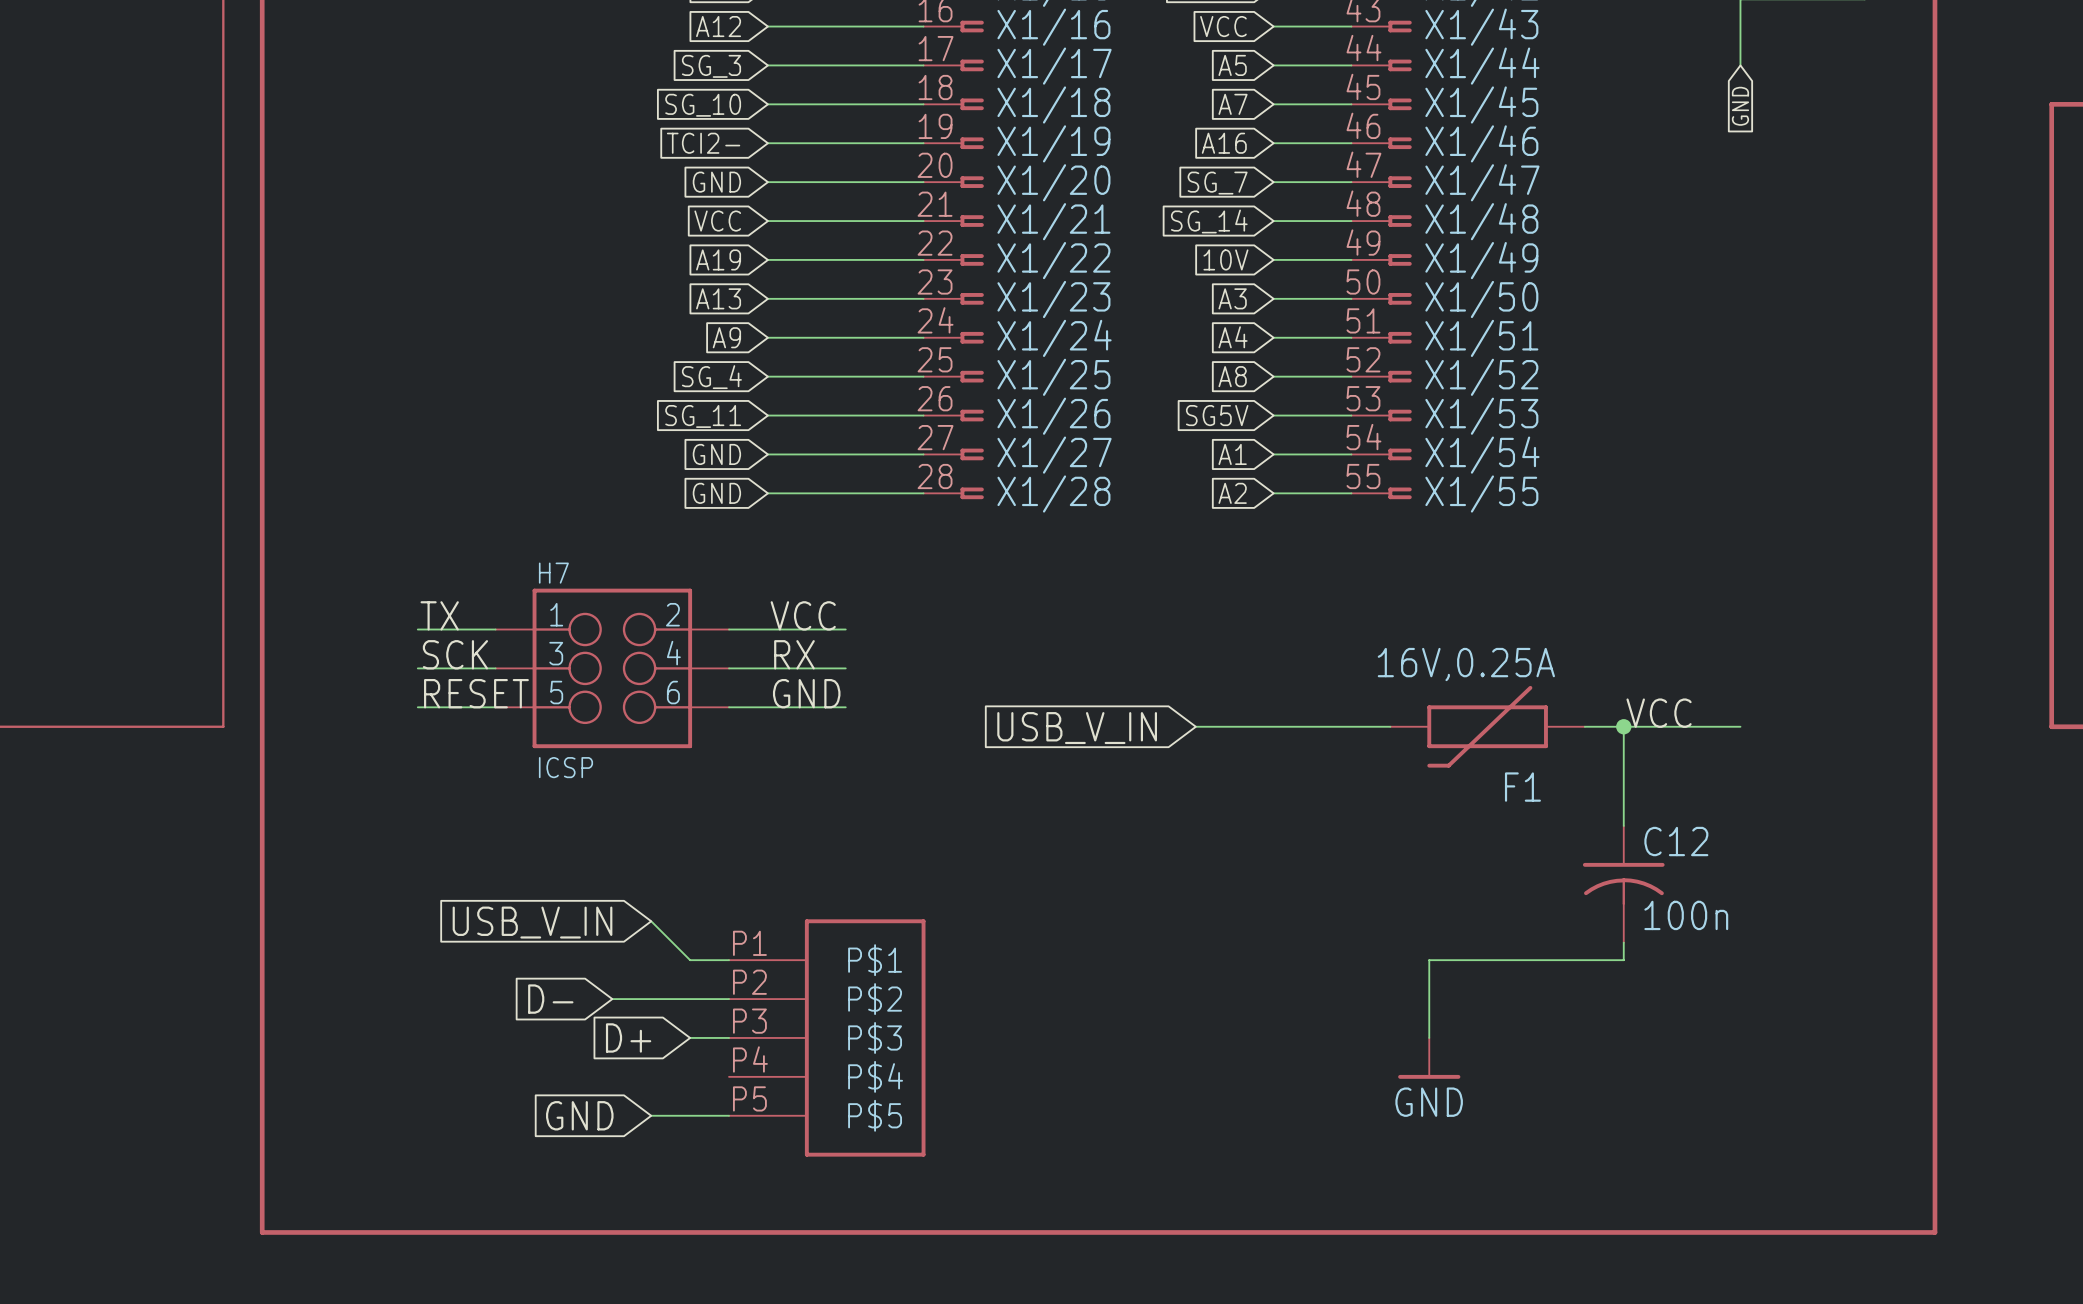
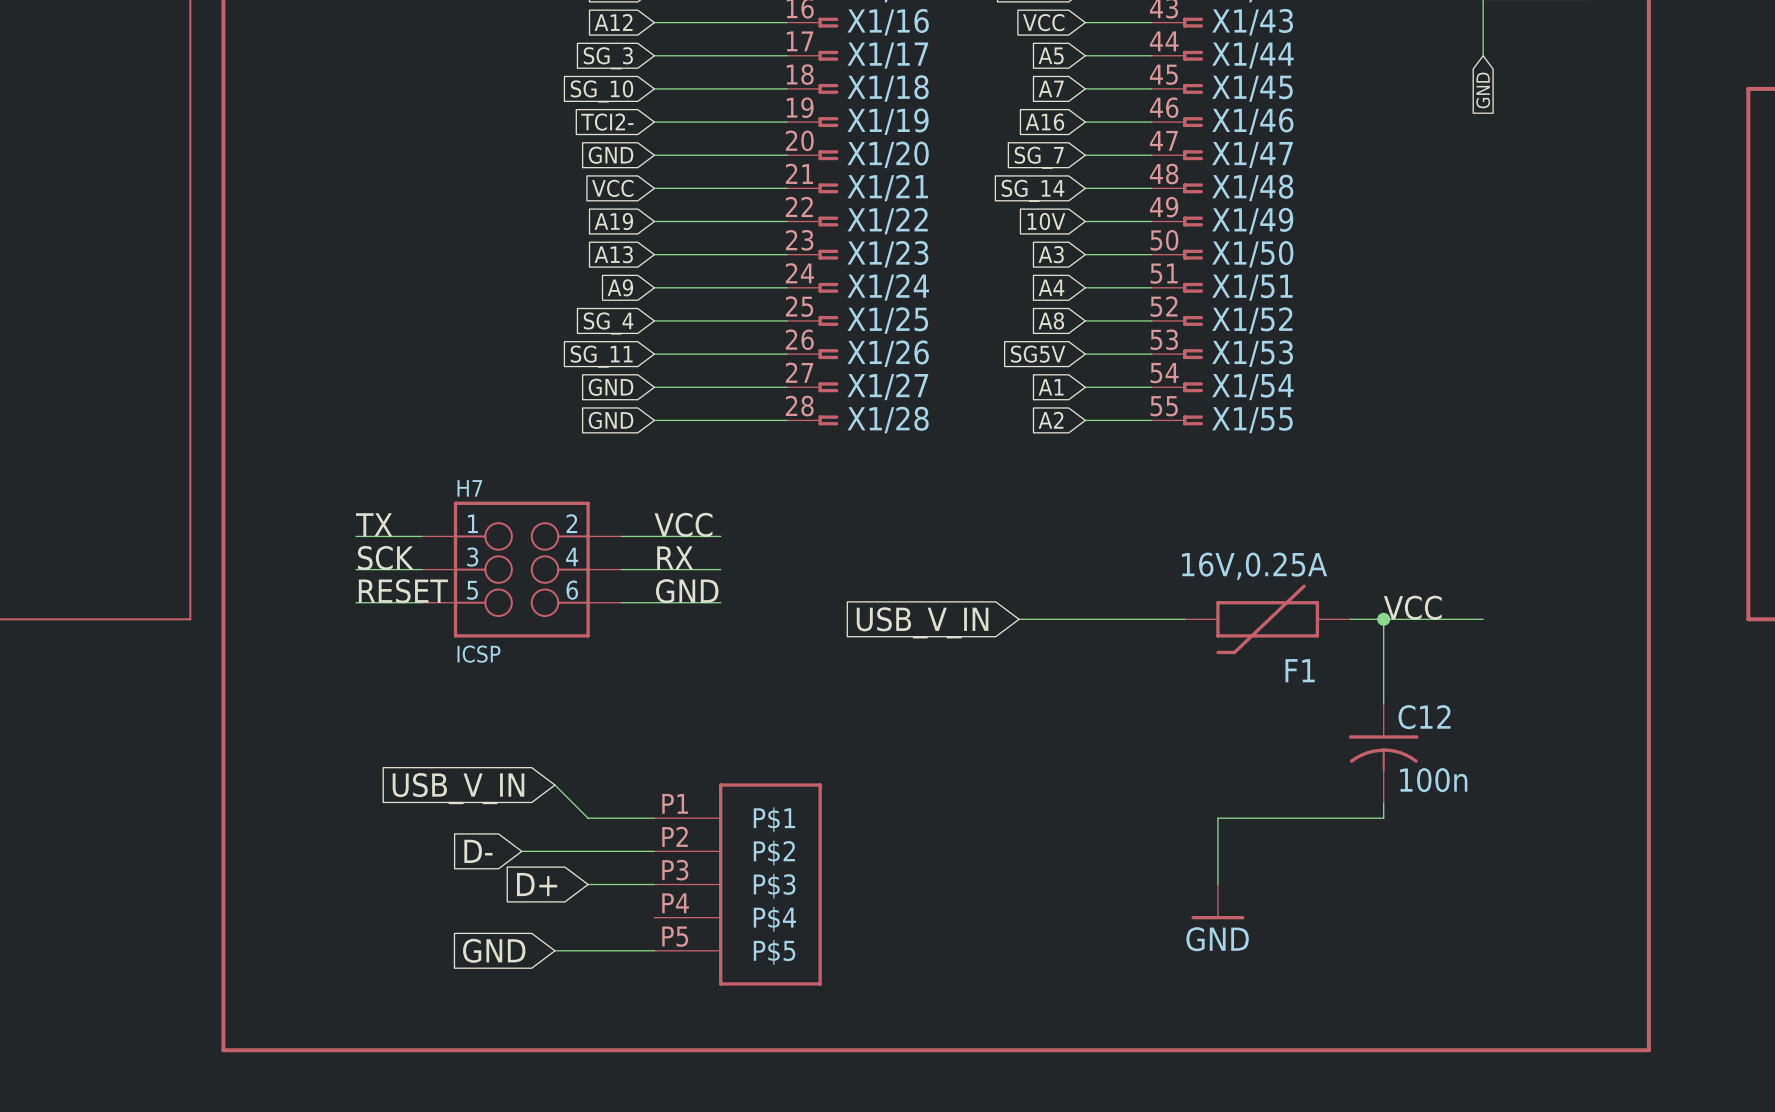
part position: (827, 1037) -> (738, 884)

